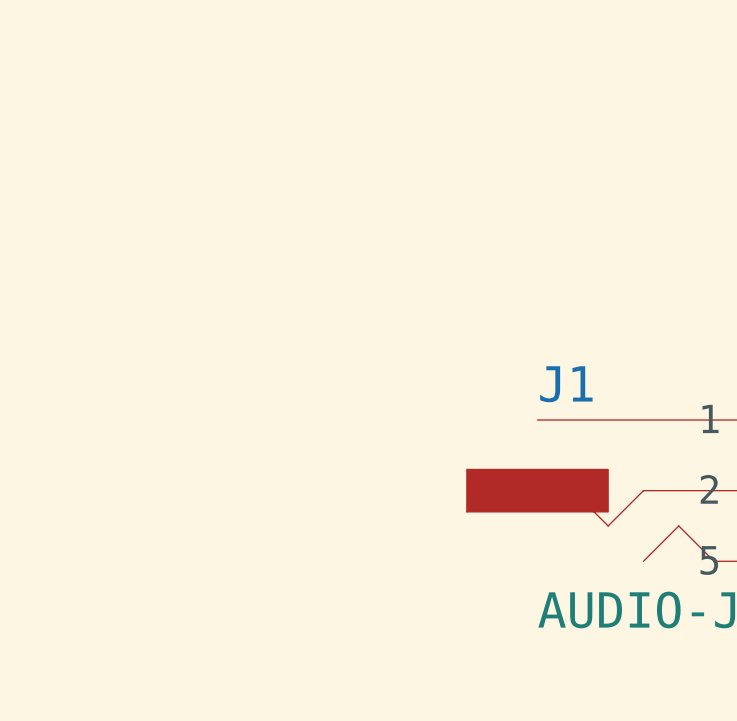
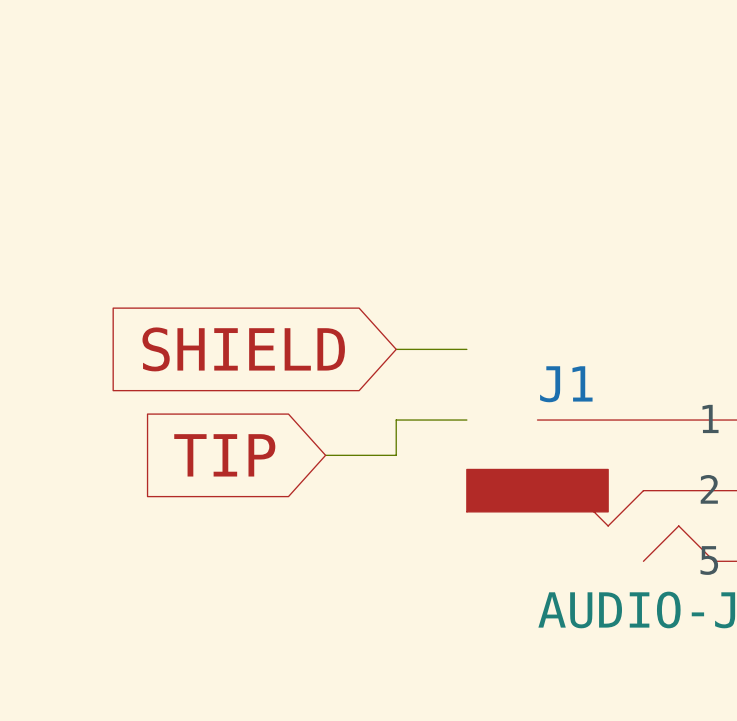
global label: none -> SHIELD (243, 349)
wire: none -> (396, 349) (466, 349)
wire: none -> (466, 420) (396, 420) (396, 455) (325, 455)
global label: none -> TIP (224, 455)

